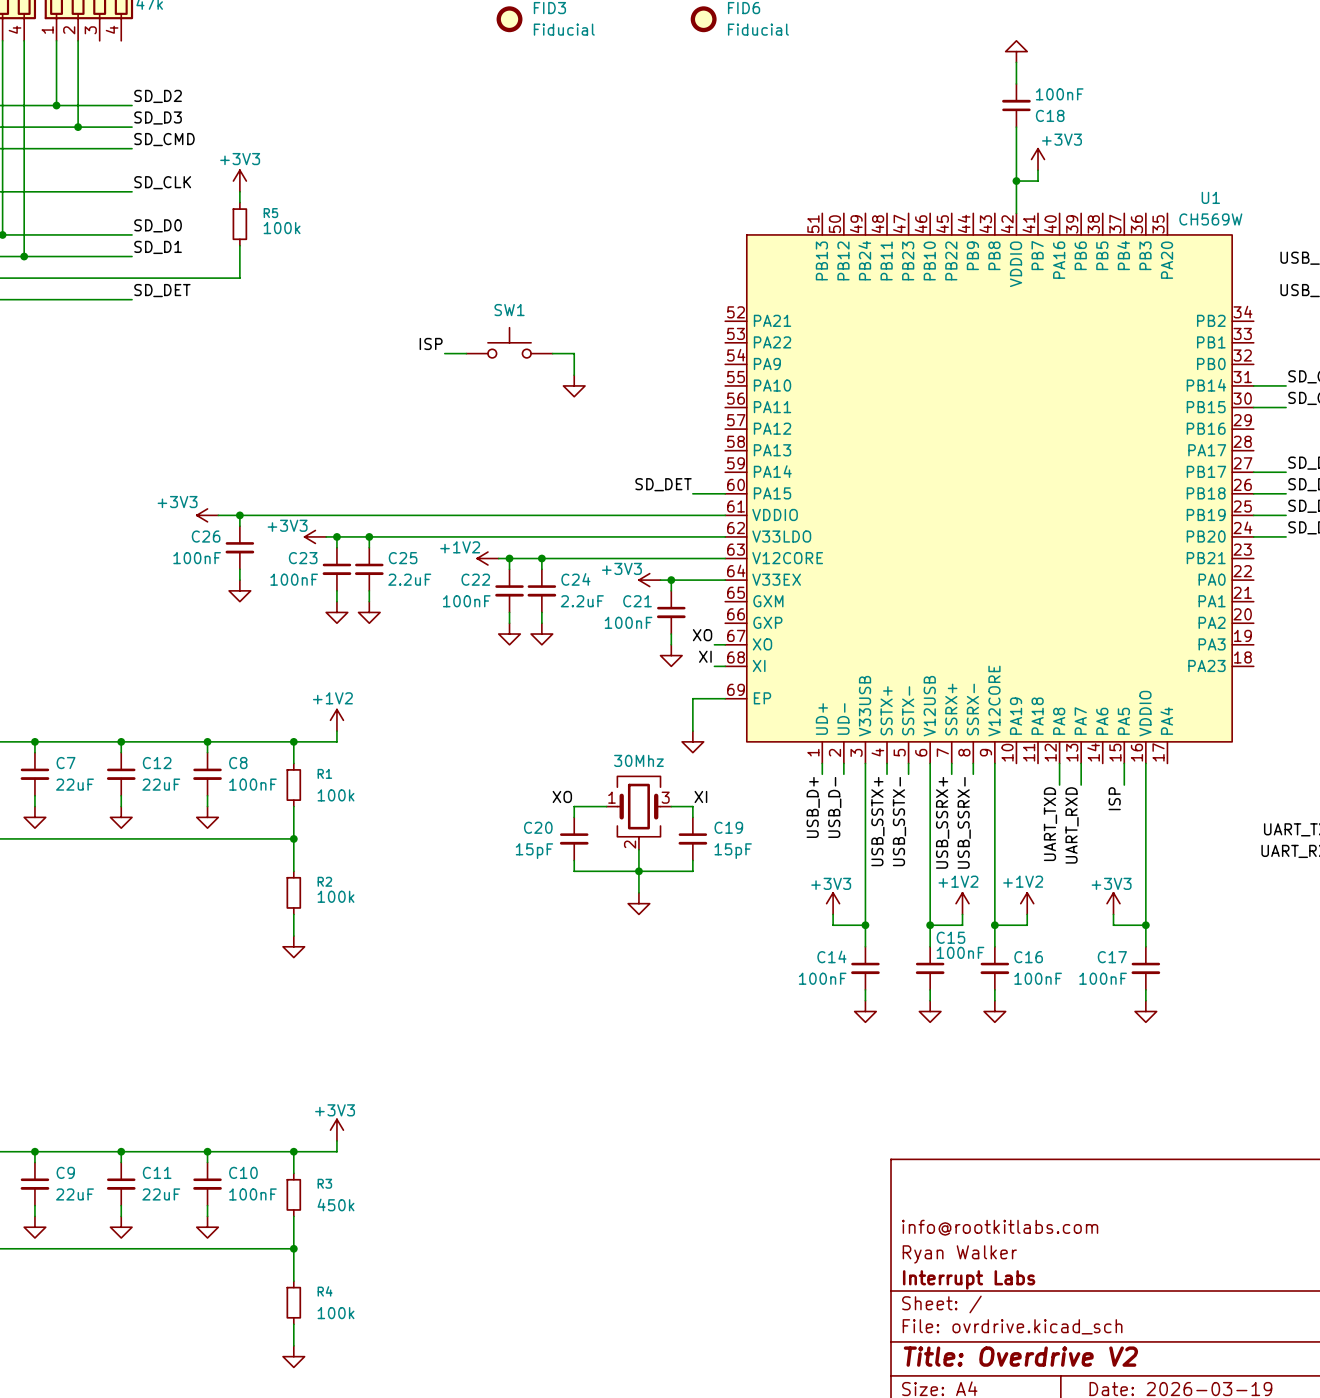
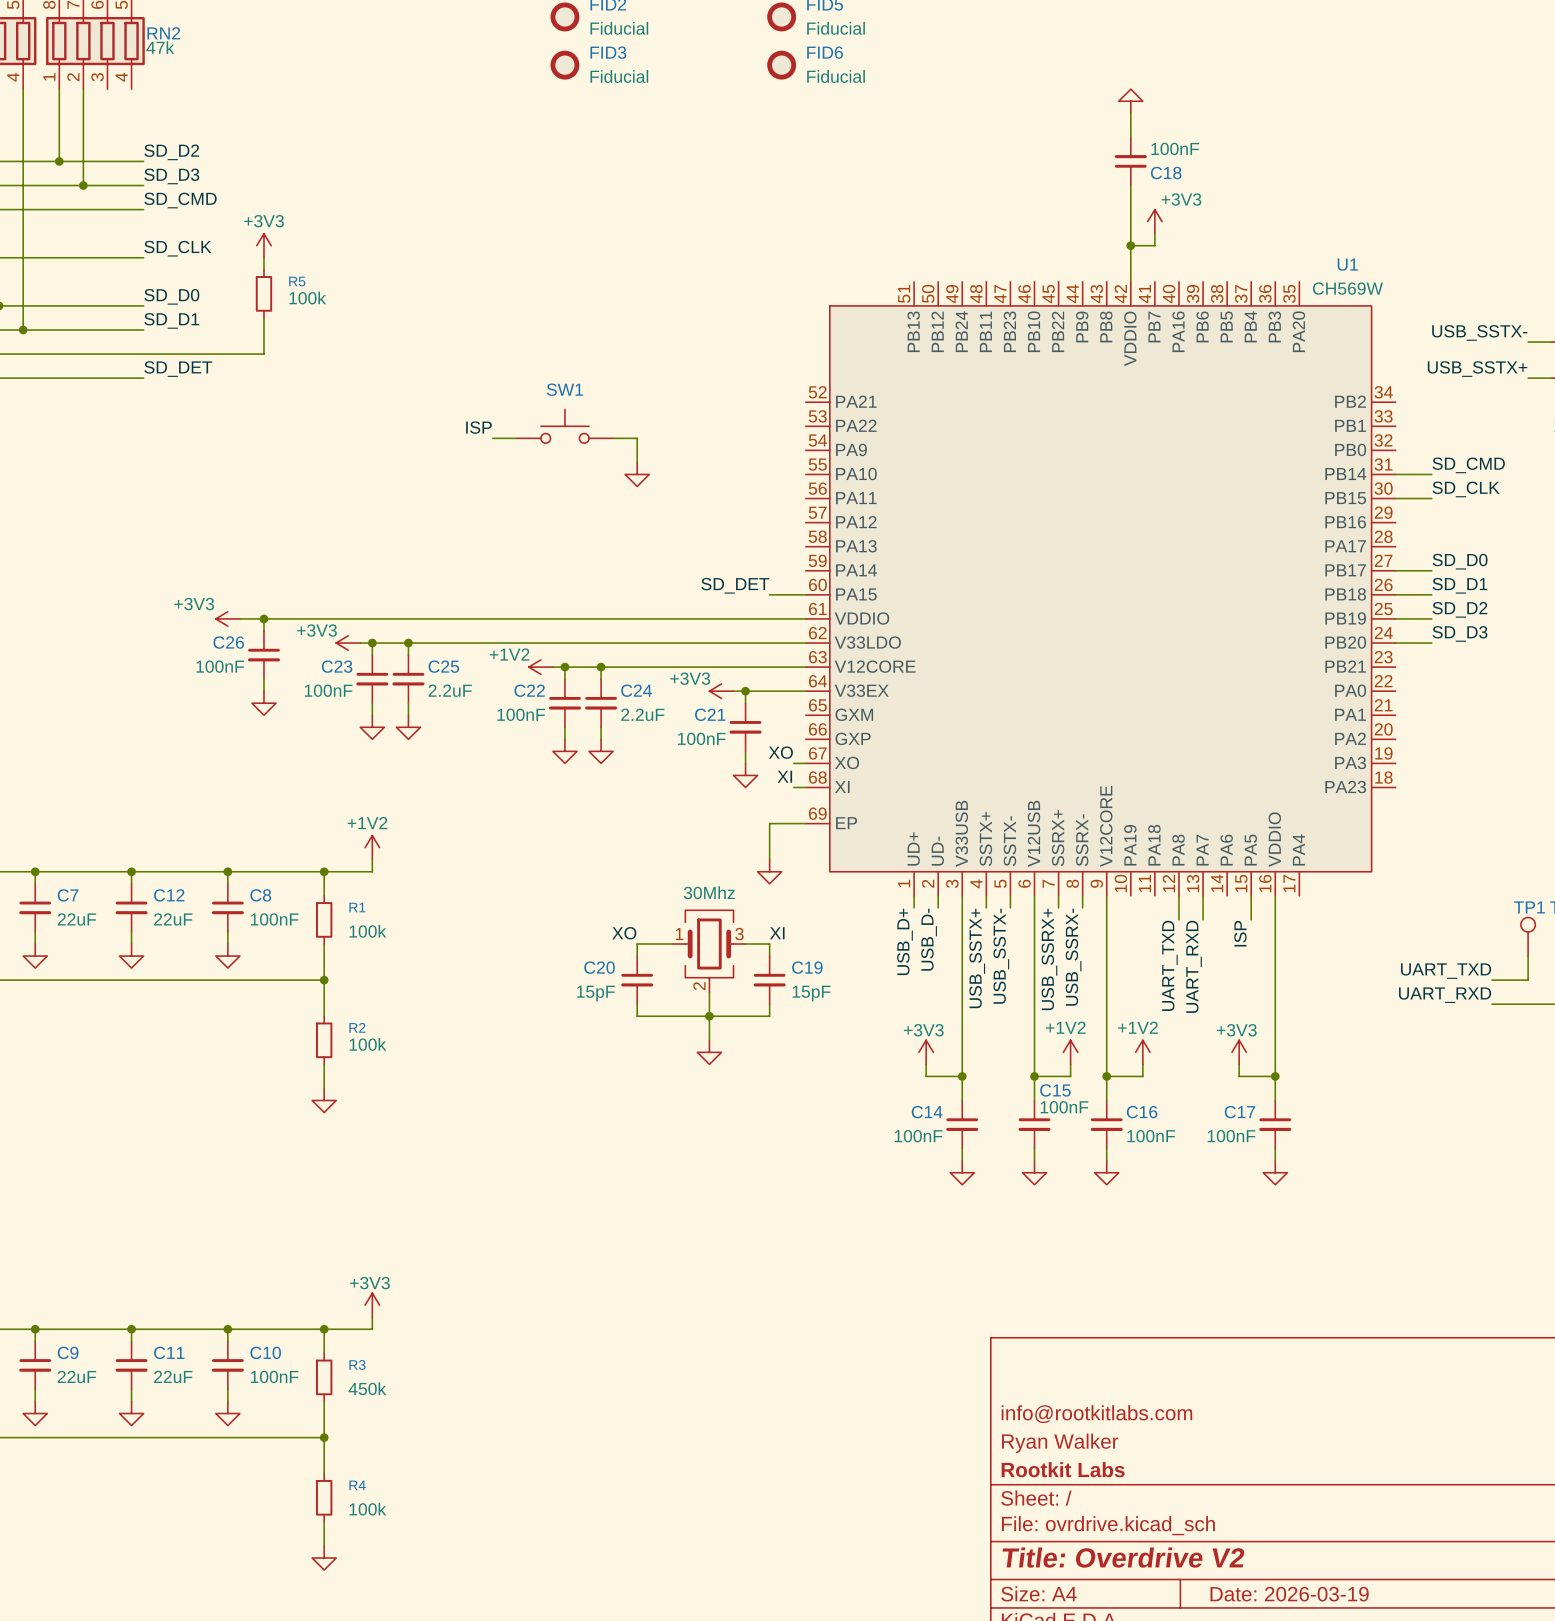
title block: Interrupt Labs (969, 1279) -> Rootkit Labs (1063, 1469)

